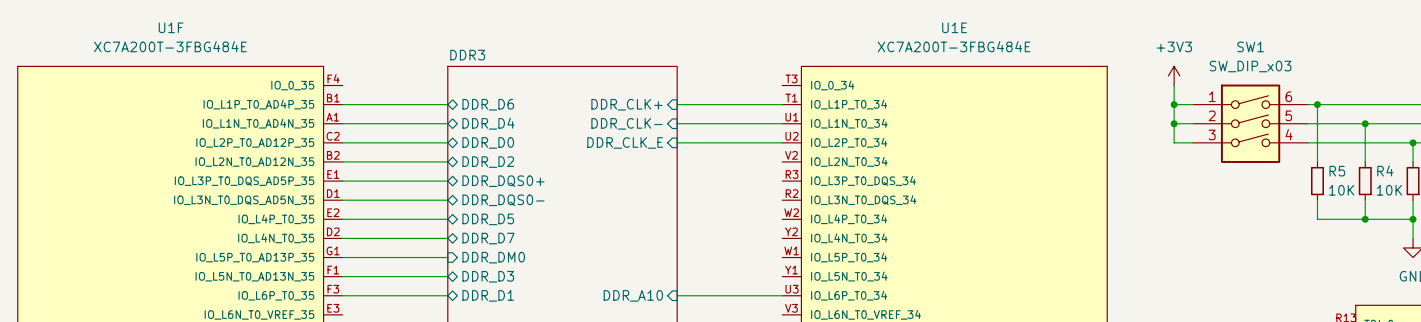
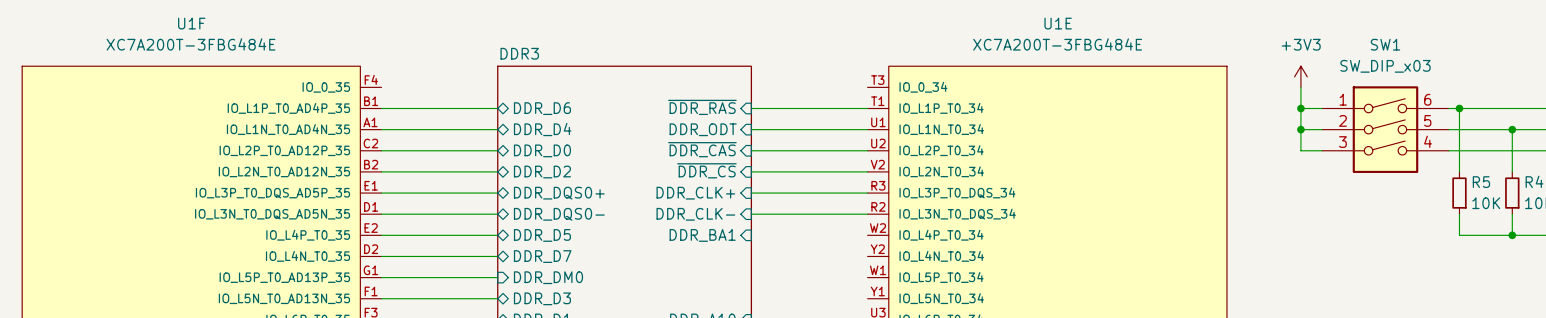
sheet pin: DDR_CLK+ (626, 104) -> ~{DDR_RAS} (702, 107)
sheet pin: DDR_CLK- (626, 123) -> DDR_ODT (703, 129)
sheet pin: DDR_CLK_E (625, 142) -> ~{DDR_CAS} (702, 149)
sheet pin: none -> ~{DDR_CS} (706, 170)
wire: none -> (751, 171) (867, 171)
sheet pin: none -> DDR_CLK+ (695, 193)
wire: none -> (751, 193) (867, 193)
sheet pin: none -> DDR_CLK- (695, 214)
wire: none -> (751, 214) (867, 214)
sheet pin: none -> DDR_BA1 (702, 235)

